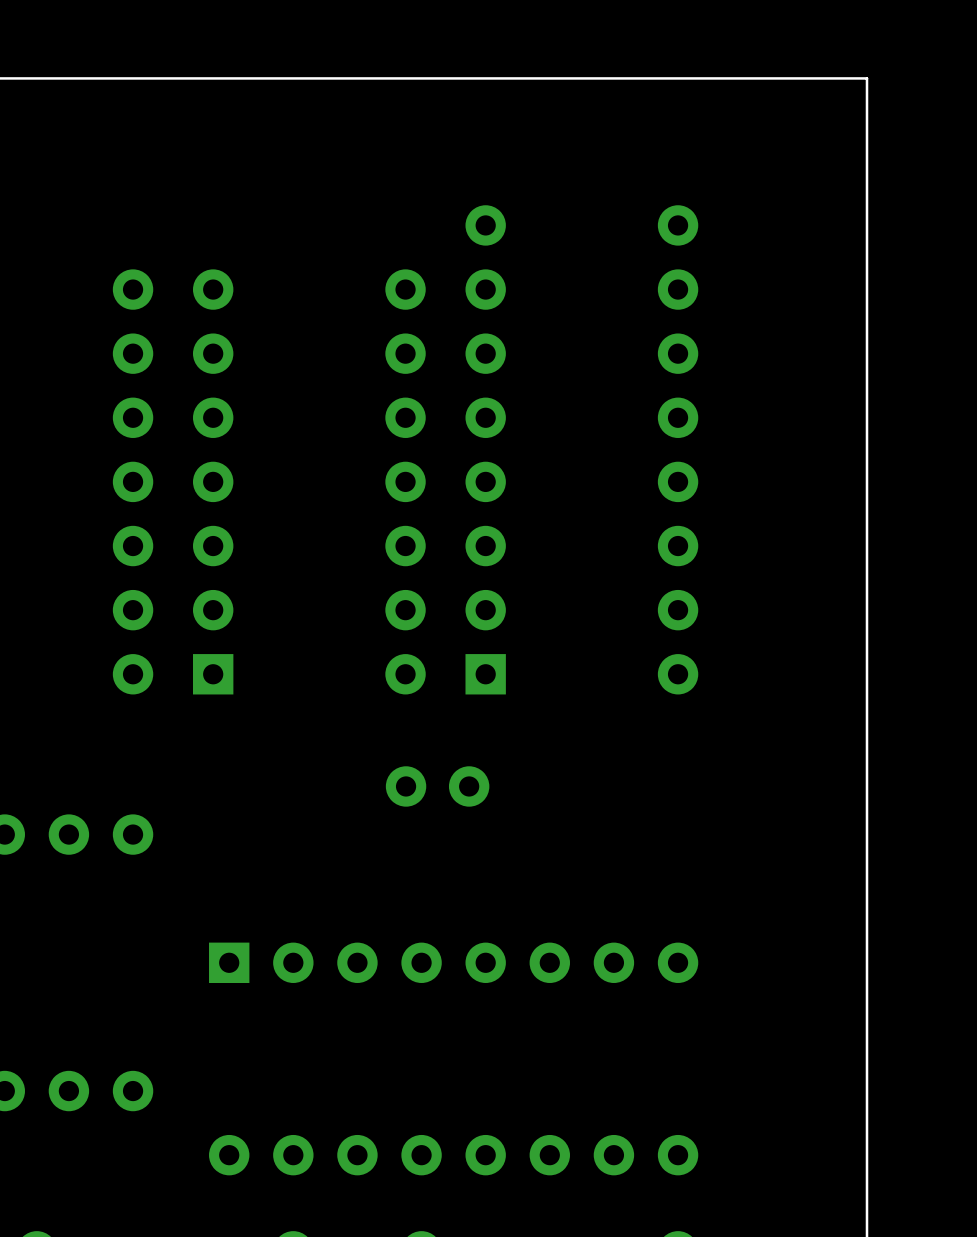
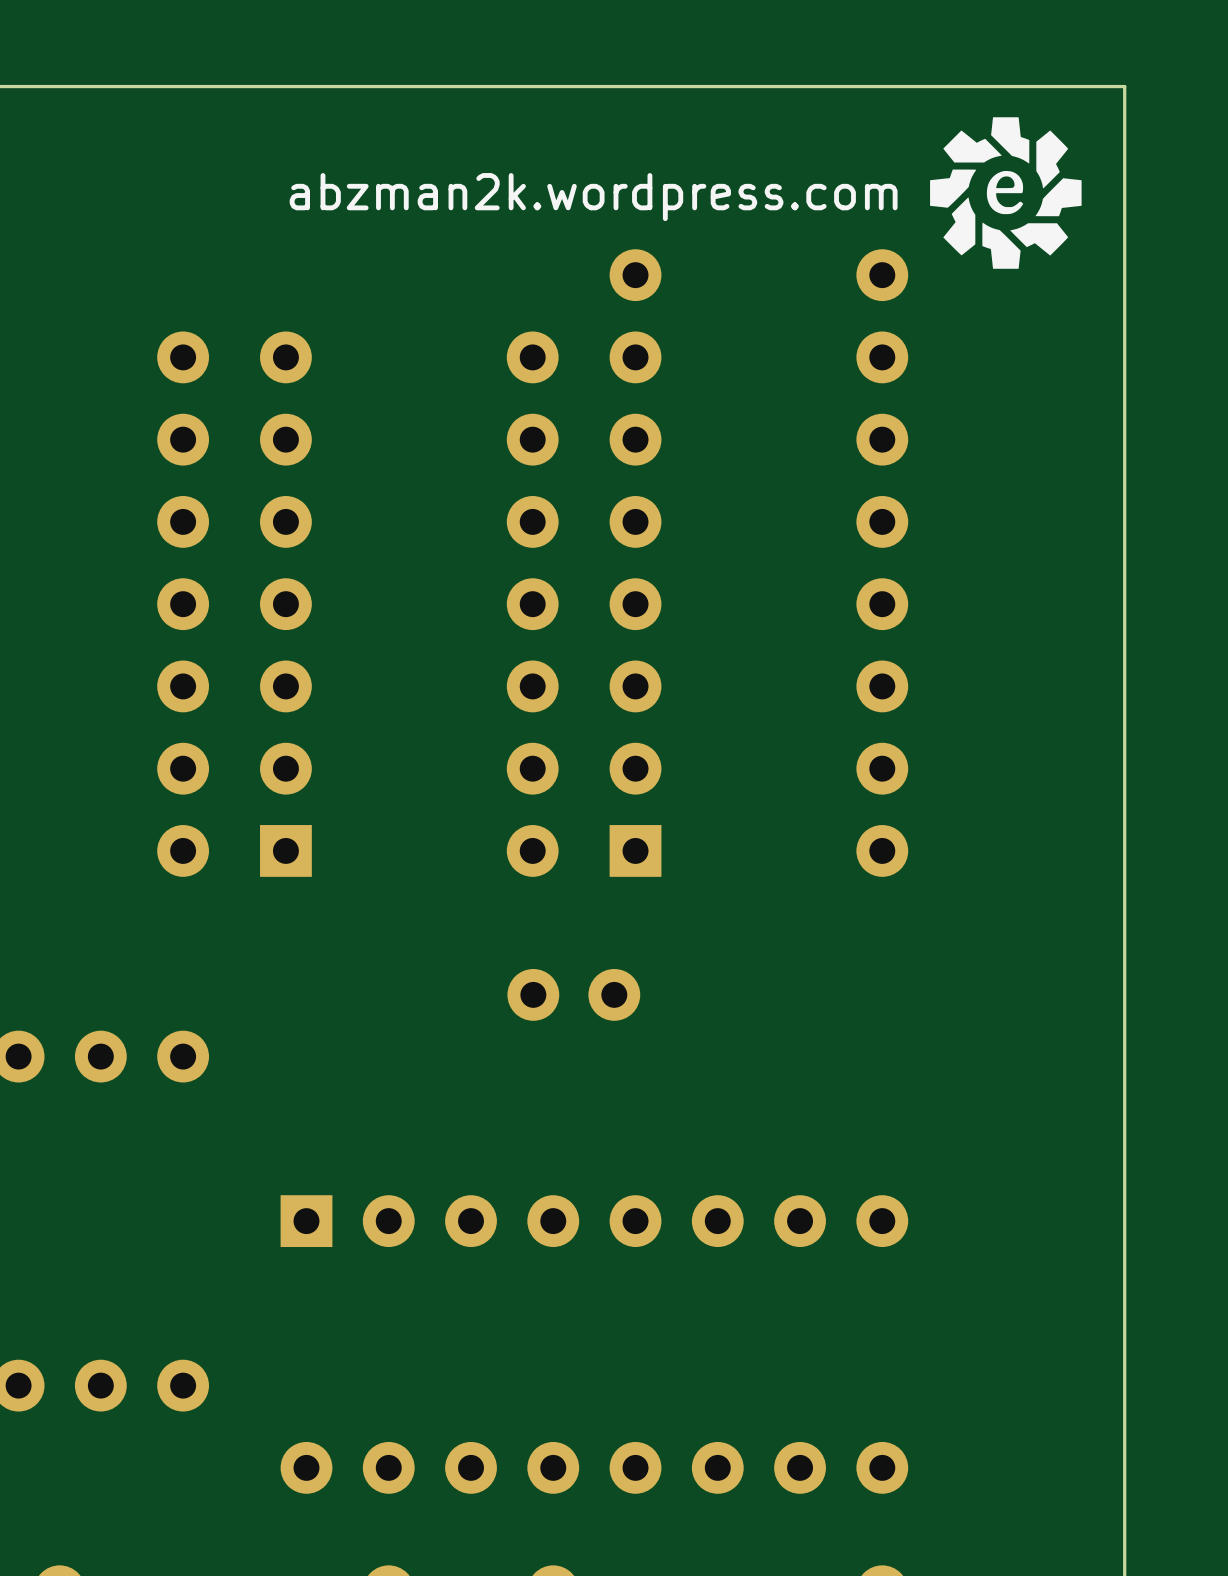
drawing: none -> [930, 117, 1082, 269]
text: none -> abzman2k.wordpress.com (593, 197)

